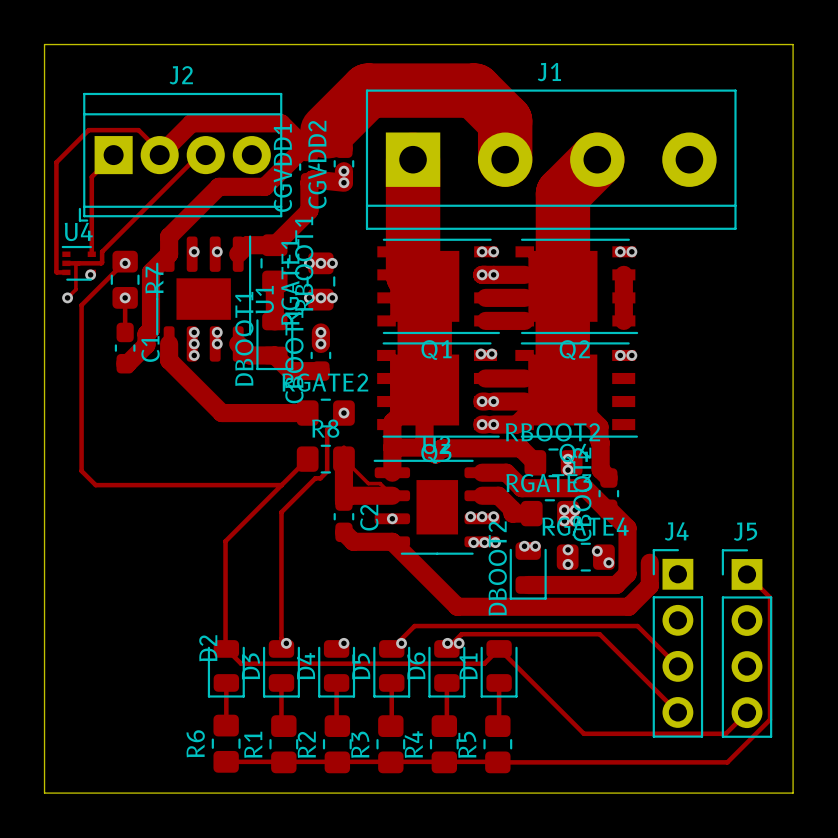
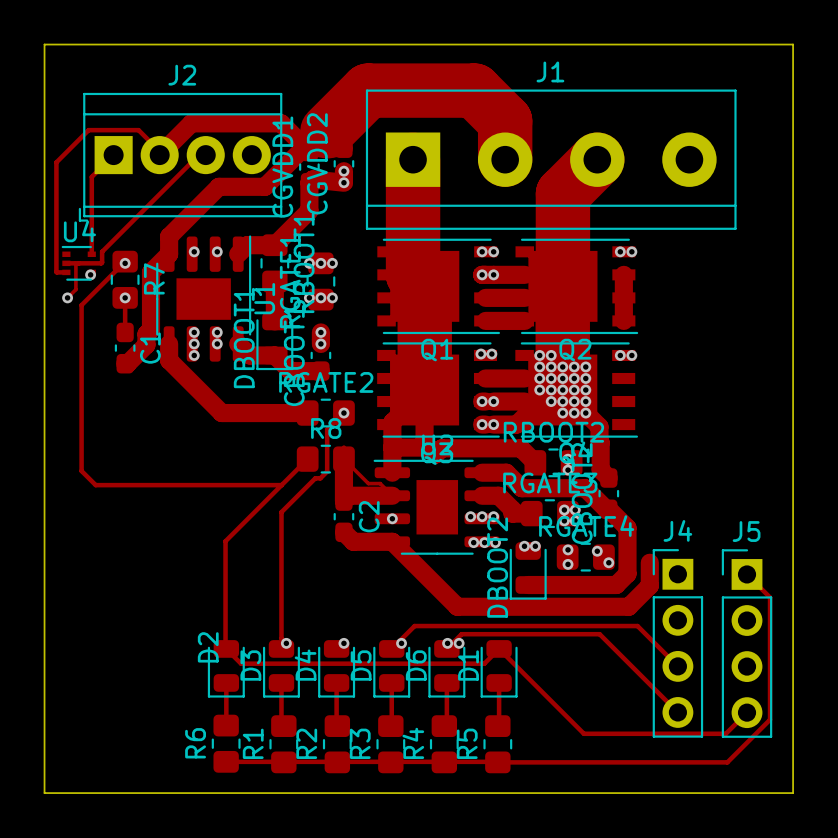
via: none -> (539, 355)
via: none -> (551, 355)
via: none -> (539, 366)
via: none -> (551, 366)
via: none -> (562, 366)
via: none -> (574, 366)
via: none -> (585, 366)
via: none -> (539, 378)
via: none -> (551, 378)
via: none -> (562, 378)
via: none -> (574, 378)
via: none -> (585, 378)
via: none -> (539, 390)
via: none -> (551, 390)
via: none -> (562, 390)
via: none -> (574, 390)
via: none -> (585, 390)
via: none -> (551, 401)
via: none -> (562, 401)
via: none -> (574, 401)
via: none -> (585, 401)
via: none -> (562, 413)
via: none -> (574, 413)
via: none -> (585, 413)

